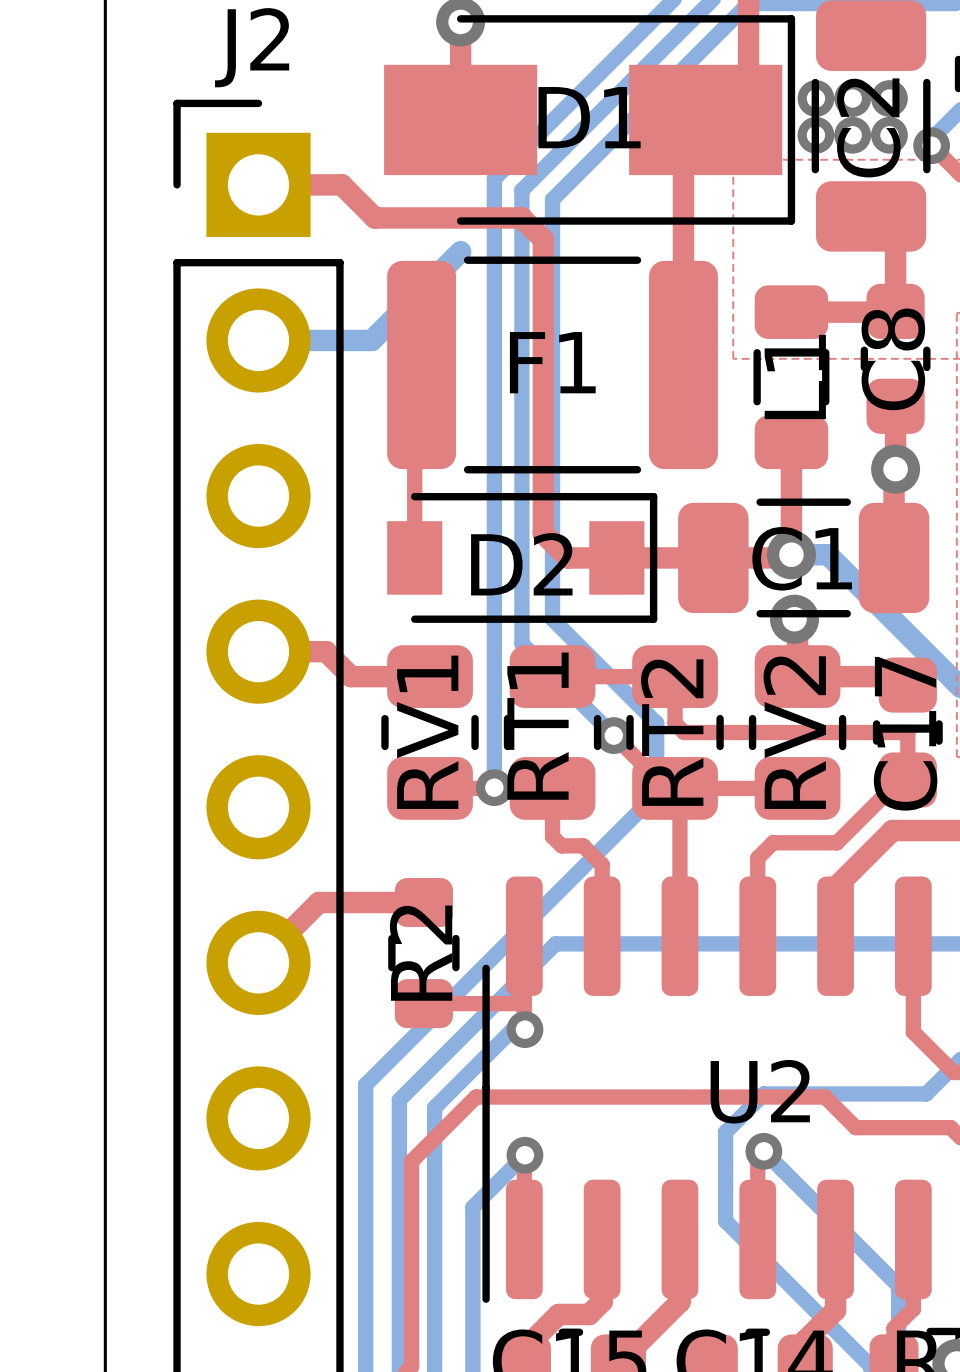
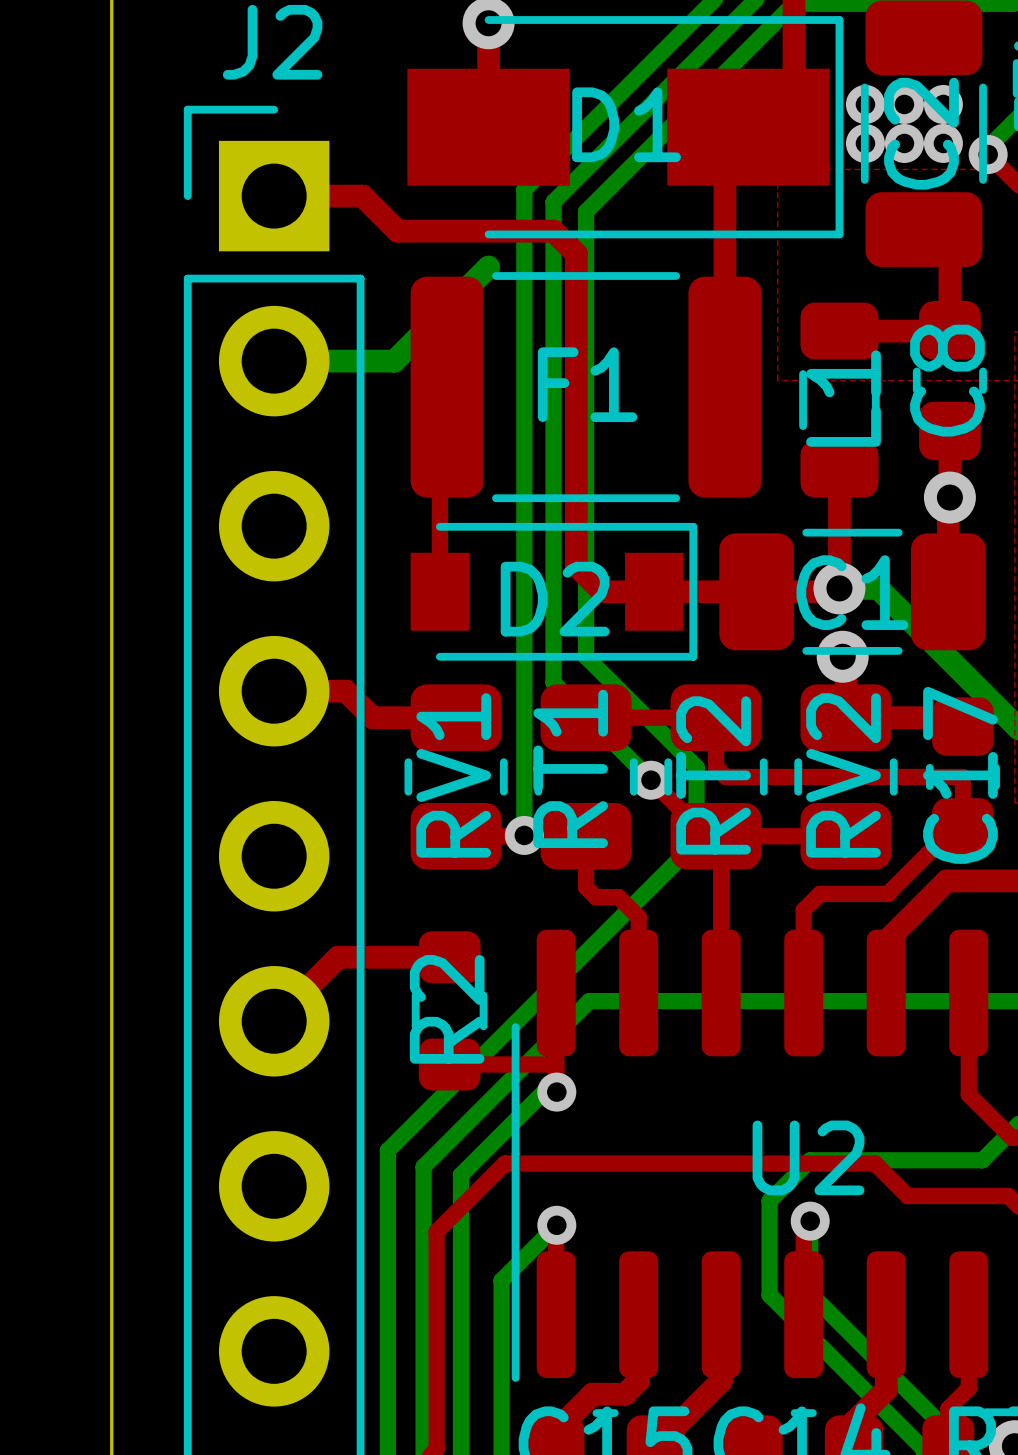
bottom track: (763, 1151) (898, 1286) (898, 1354) -> (810, 1221) (810, 1293) (953, 1436)

